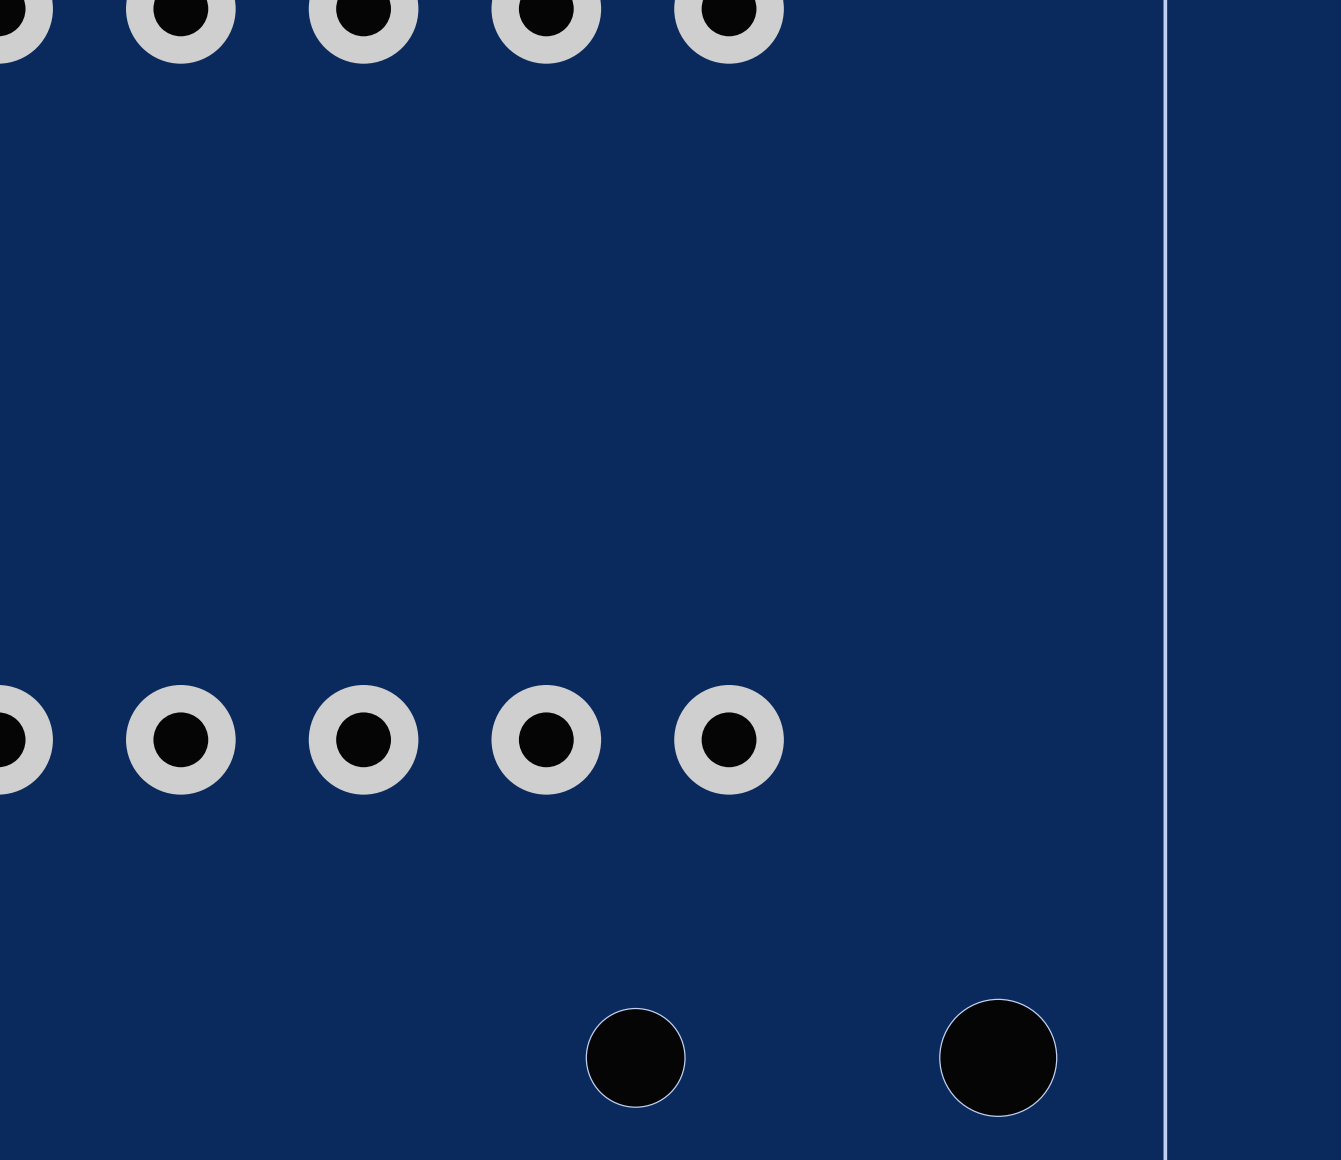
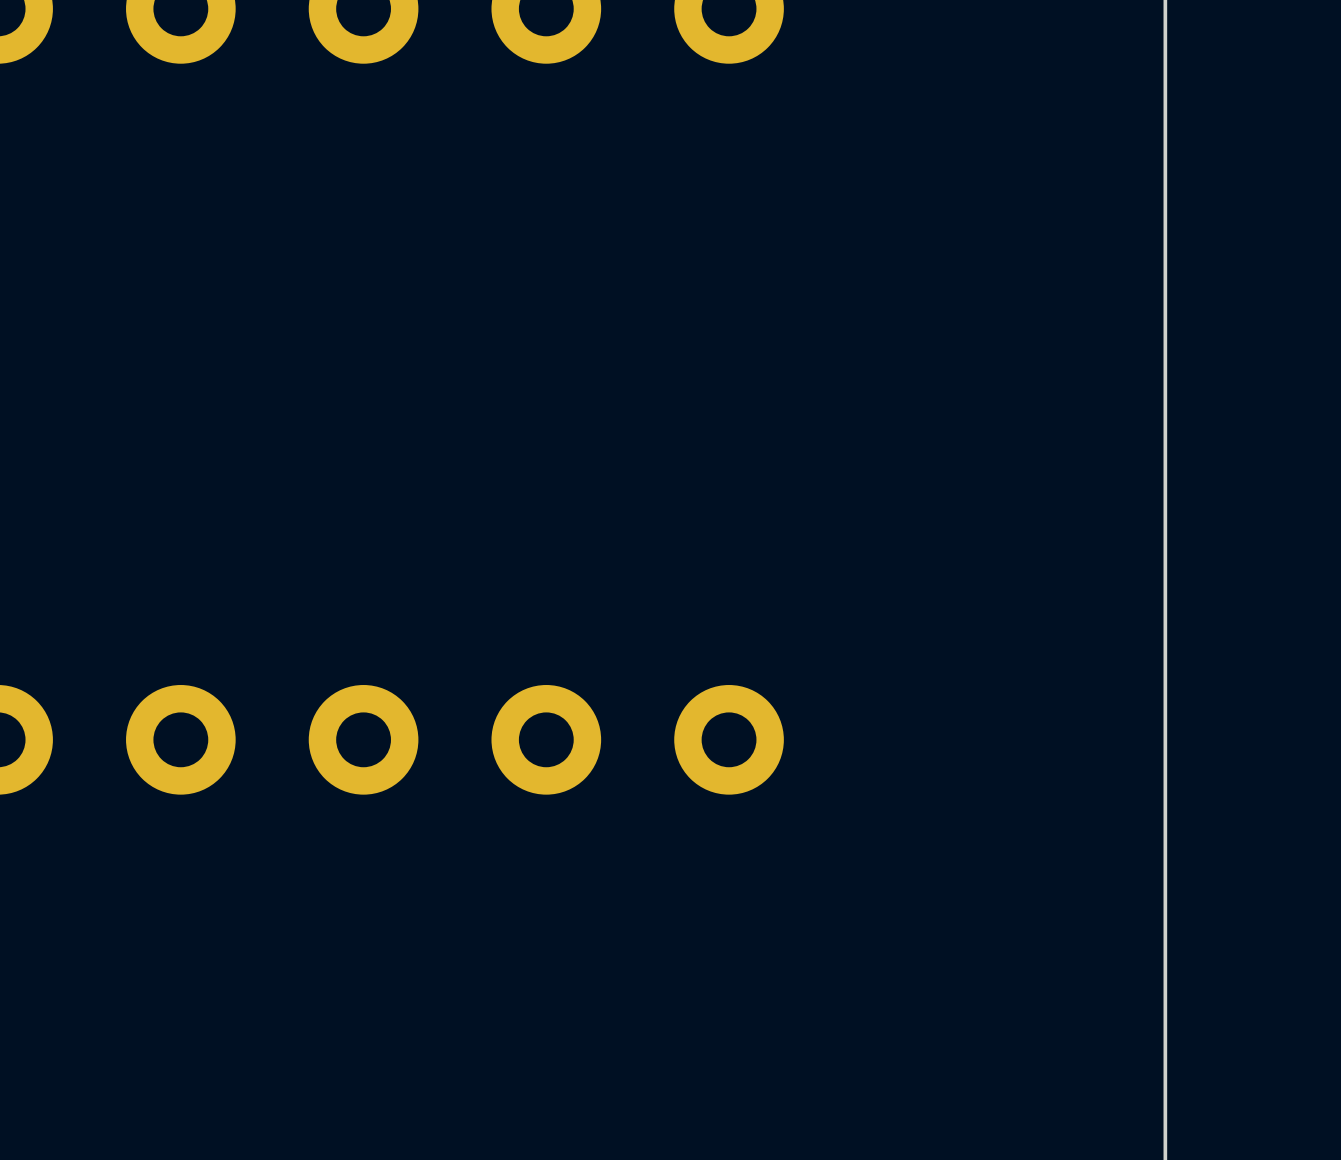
part: (635, 1057) -> none
part: (998, 1057) -> none

